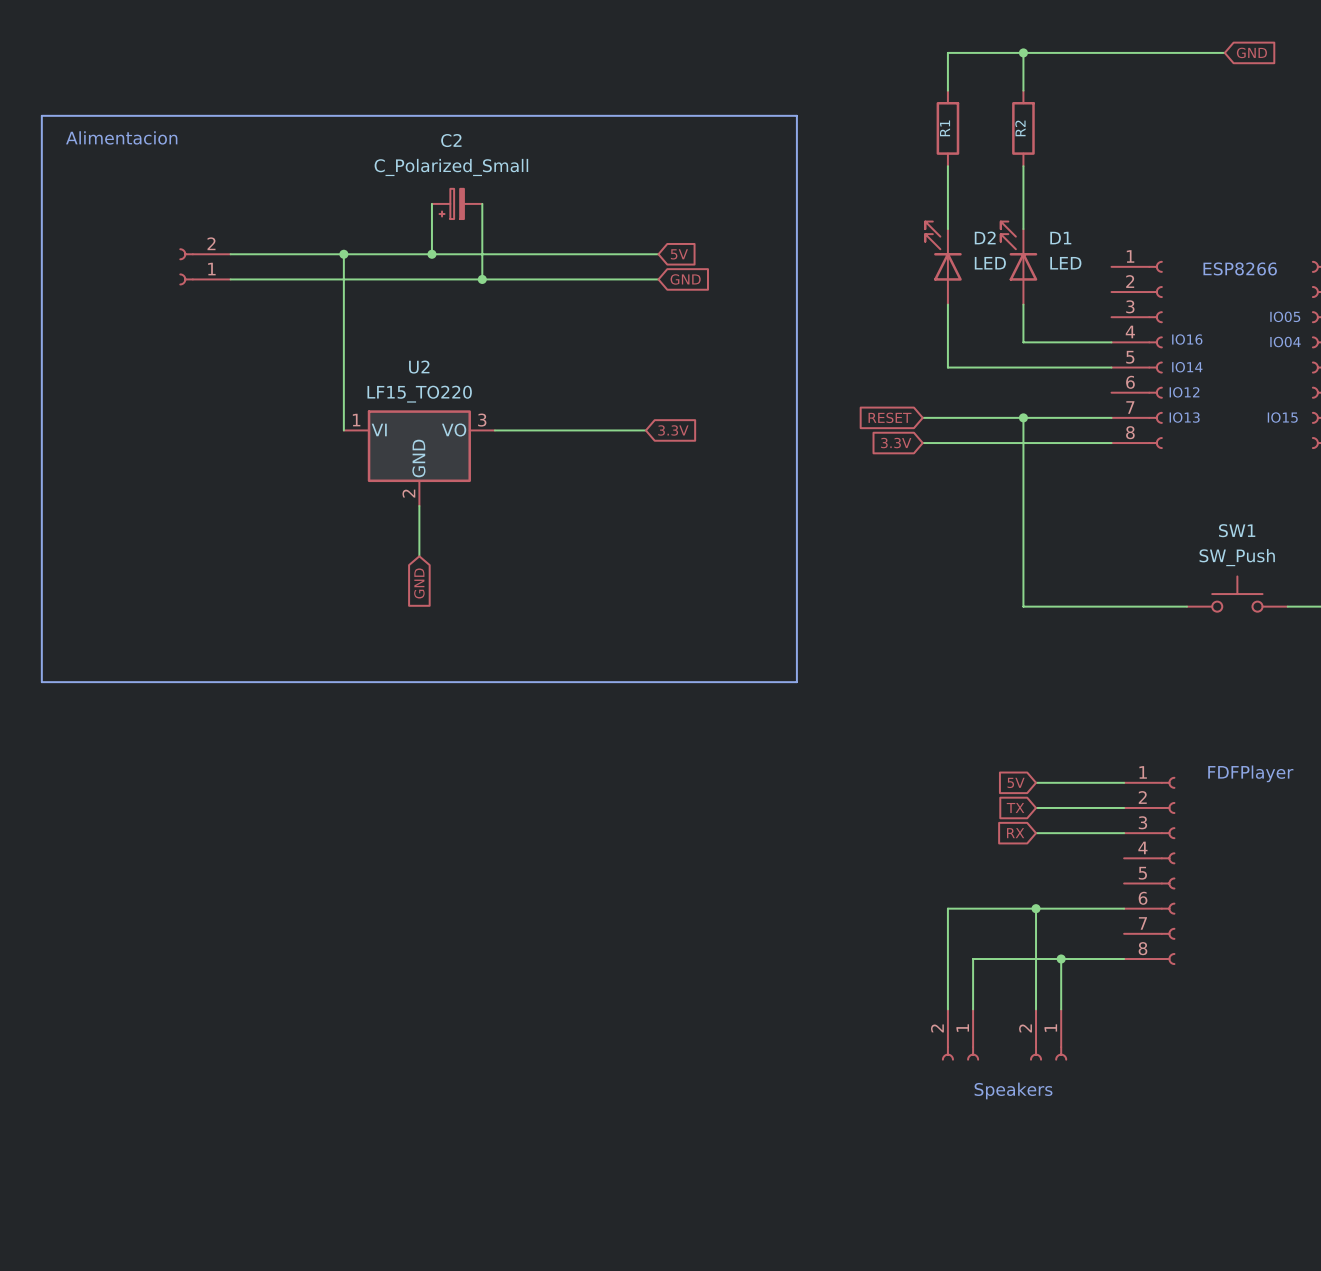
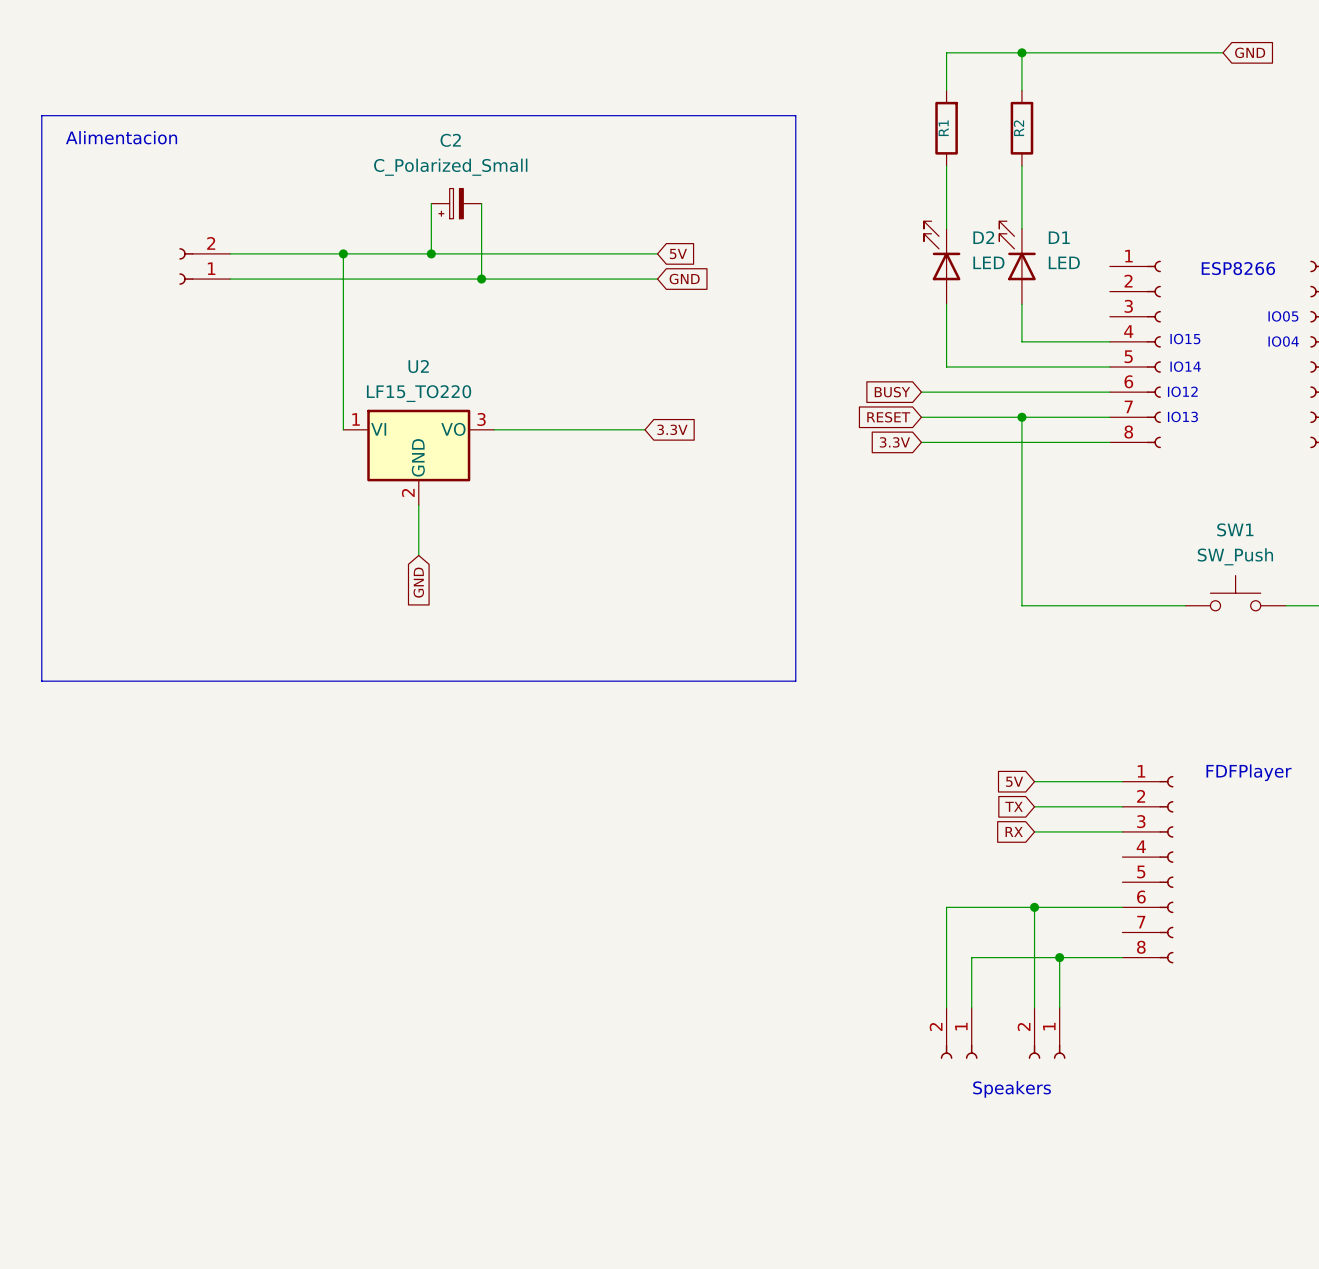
text: IO16 (1187, 339) -> IO15 (1185, 339)
global label: none -> BUSY (892, 392)
wire: none -> (921, 392) (1109, 392)
text: IO15 (1282, 417) -> none

